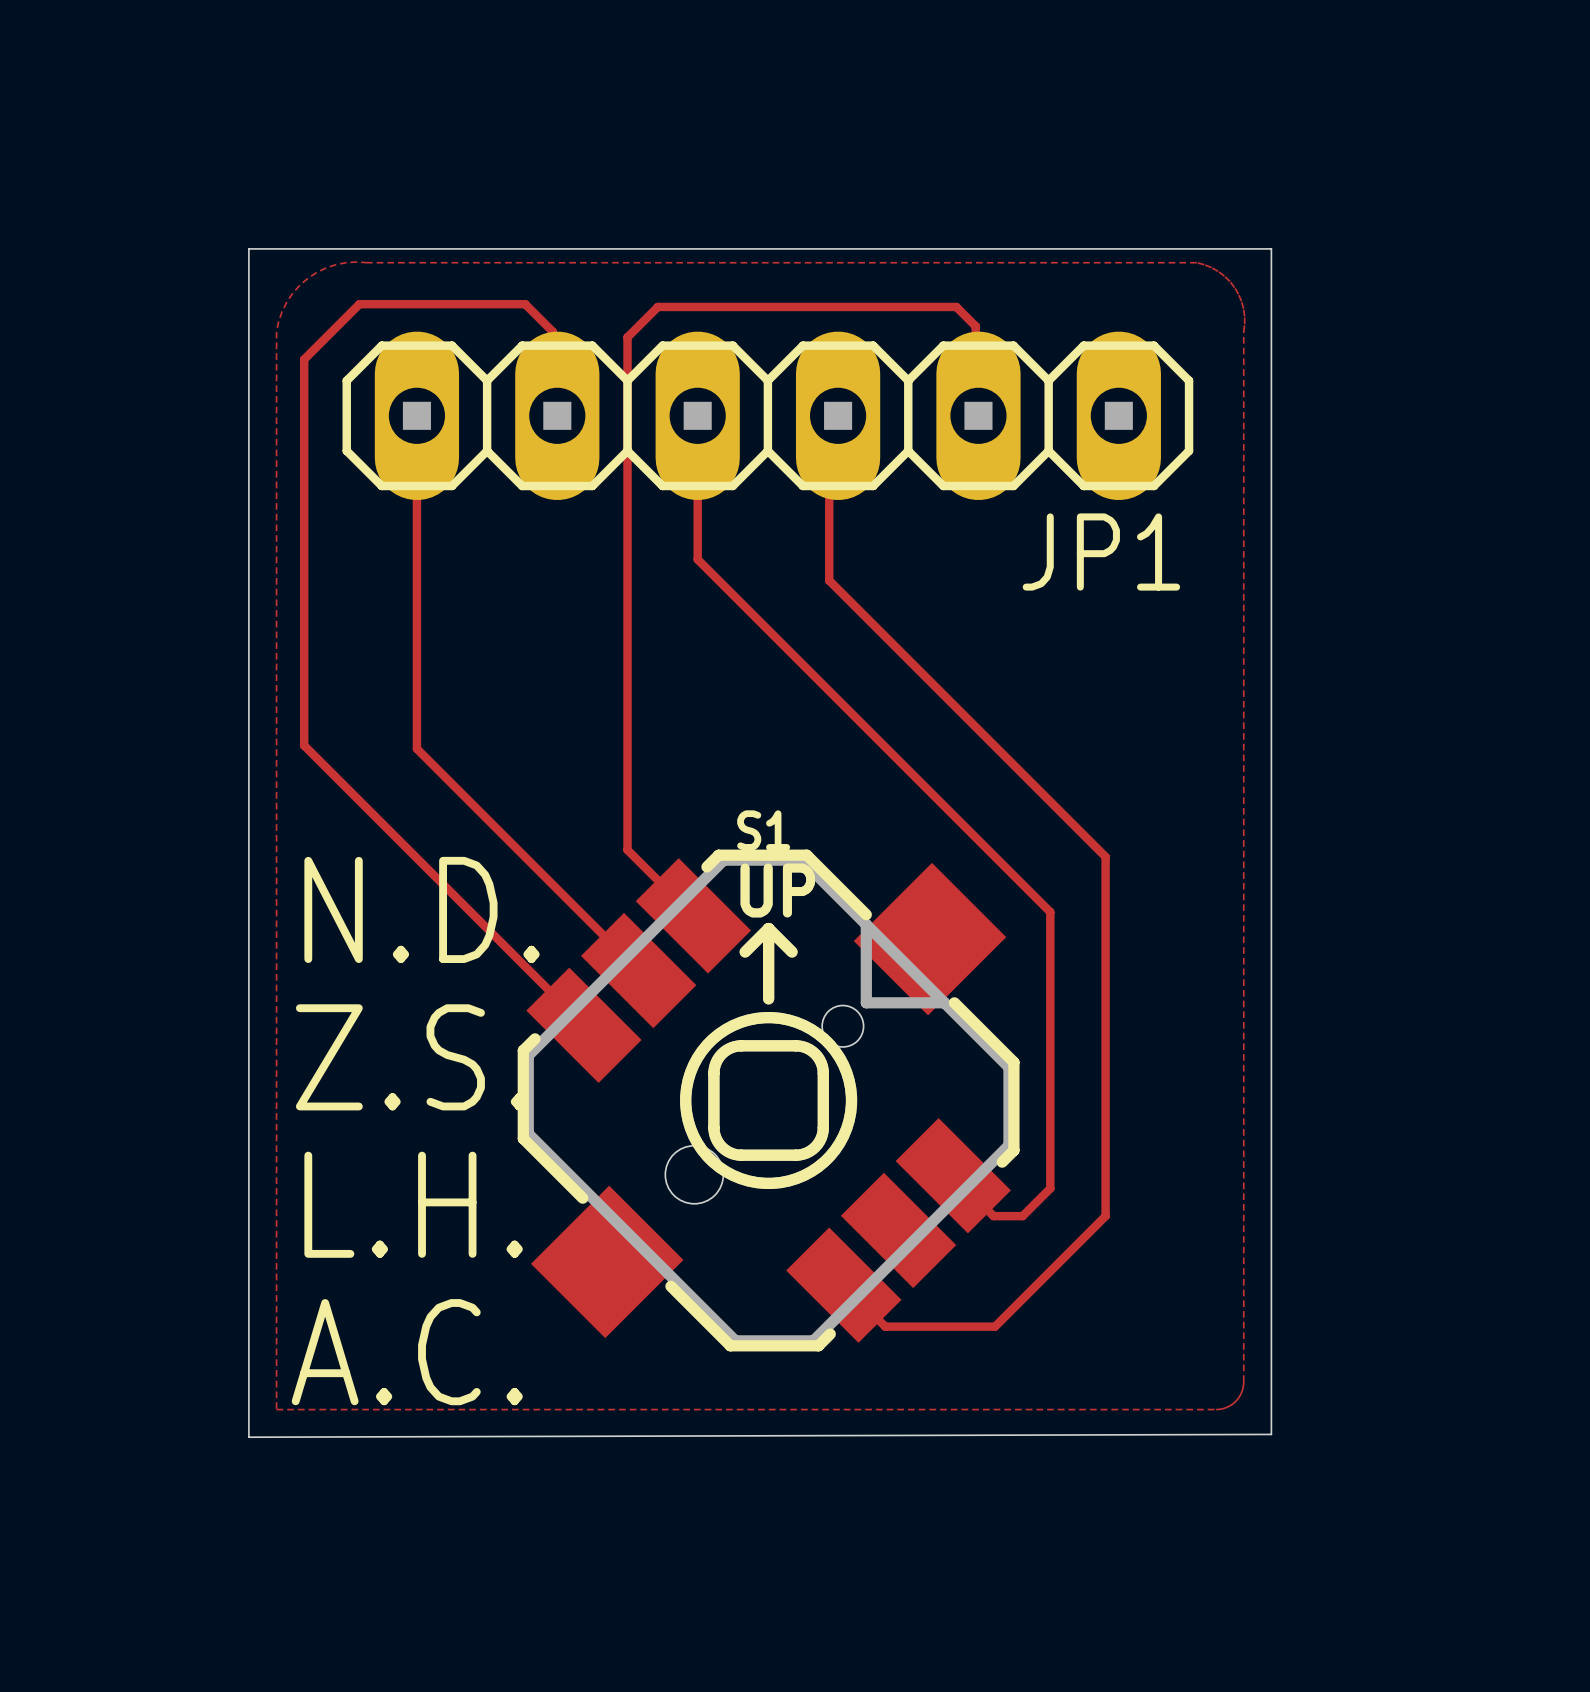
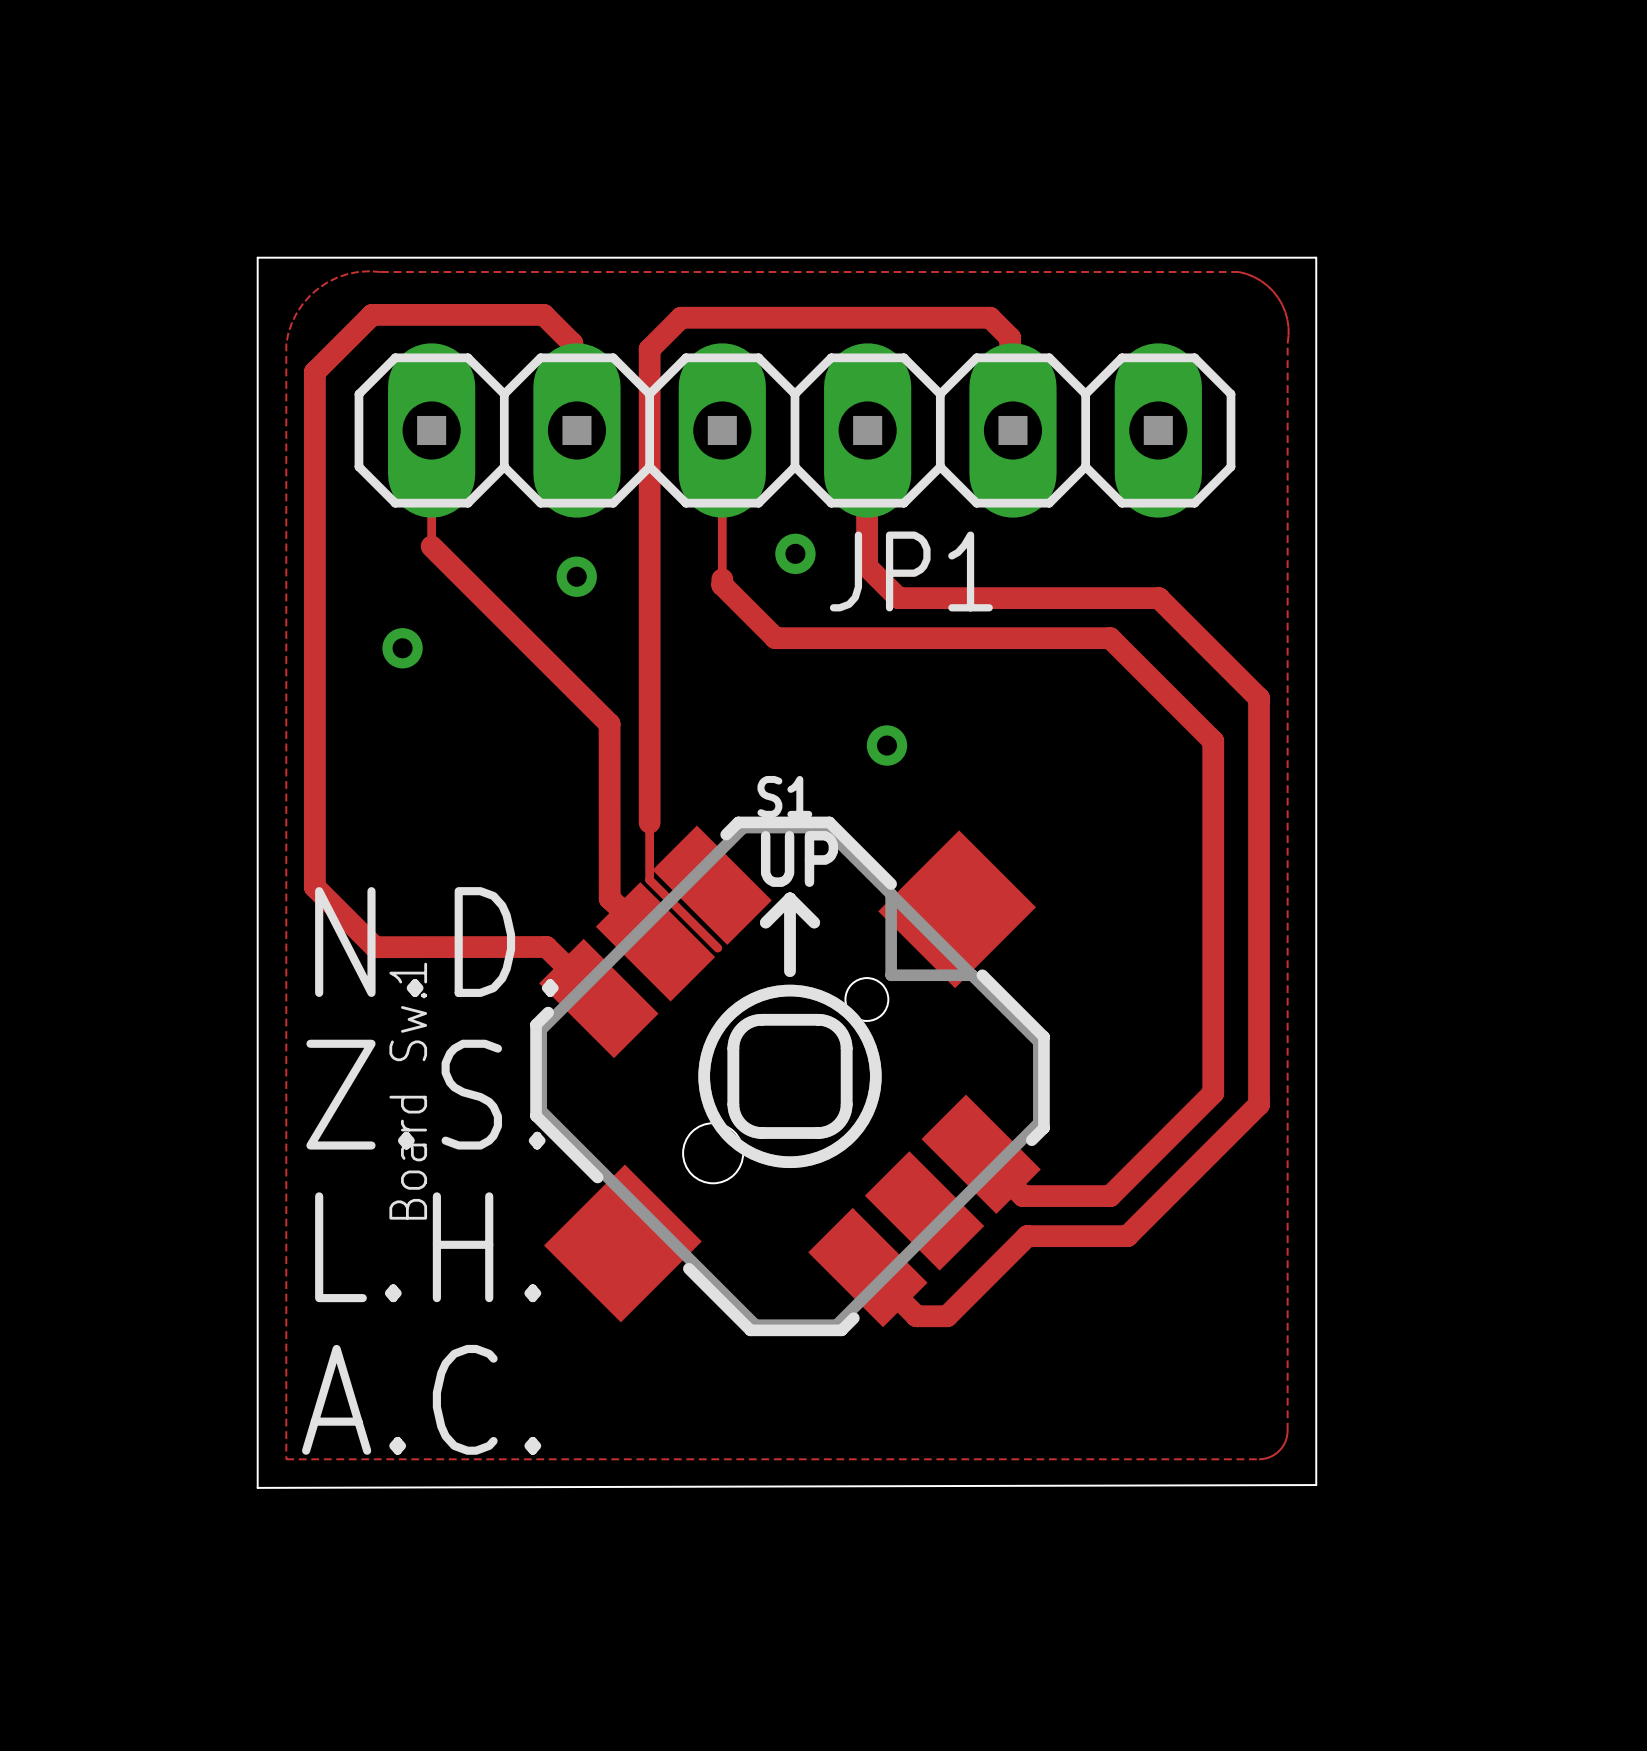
top track width: thin (552, 411) (552, 331) (525, 304) (359, 304) (304, 359) (304, 745) -> thick (572, 425) (572, 343) (543, 314) (372, 314) (314, 372) (314, 771)
top track width: thin (975, 413) (975, 326) (956, 306) (657, 306) (627, 337) (627, 794) -> thick (1010, 427) (1010, 337) (990, 317) (681, 317) (649, 349) (649, 822)
top track: (838, 415) (829, 424) (829, 580) (1105, 856) (1105, 1216) (995, 1326) (885, 1326) (843, 1285) -> (867, 430) (867, 566) (898, 598) (1158, 598) (1259, 698) (1259, 1104) (1127, 1236) (1027, 1236) (947, 1316) (916, 1316) (867, 1267)
top track: (416, 527) (416, 748) (638, 970) -> (431, 546) (609, 724) (609, 898) (655, 941)
via: none -> (795, 553)
JP1 name position: JP1 (1101, 552) -> JP1 (911, 571)
via: none -> (576, 576)
top track: (697, 559) (1050, 912) (1050, 1188) (1022, 1216) (993, 1216) (953, 1175) -> (722, 579) (722, 584) (775, 638) (1110, 638) (1213, 741) (1213, 1093) (1110, 1196) (1022, 1196) (981, 1154)
via: none -> (402, 648)
via: none -> (886, 745)
top track: (304, 745) (583, 1025) -> (314, 771) (314, 887) (374, 947) (546, 947) (598, 998)
text: none -> Board Sw.1 (408, 1091)
S1 position: (768, 1100) -> (790, 1076)

